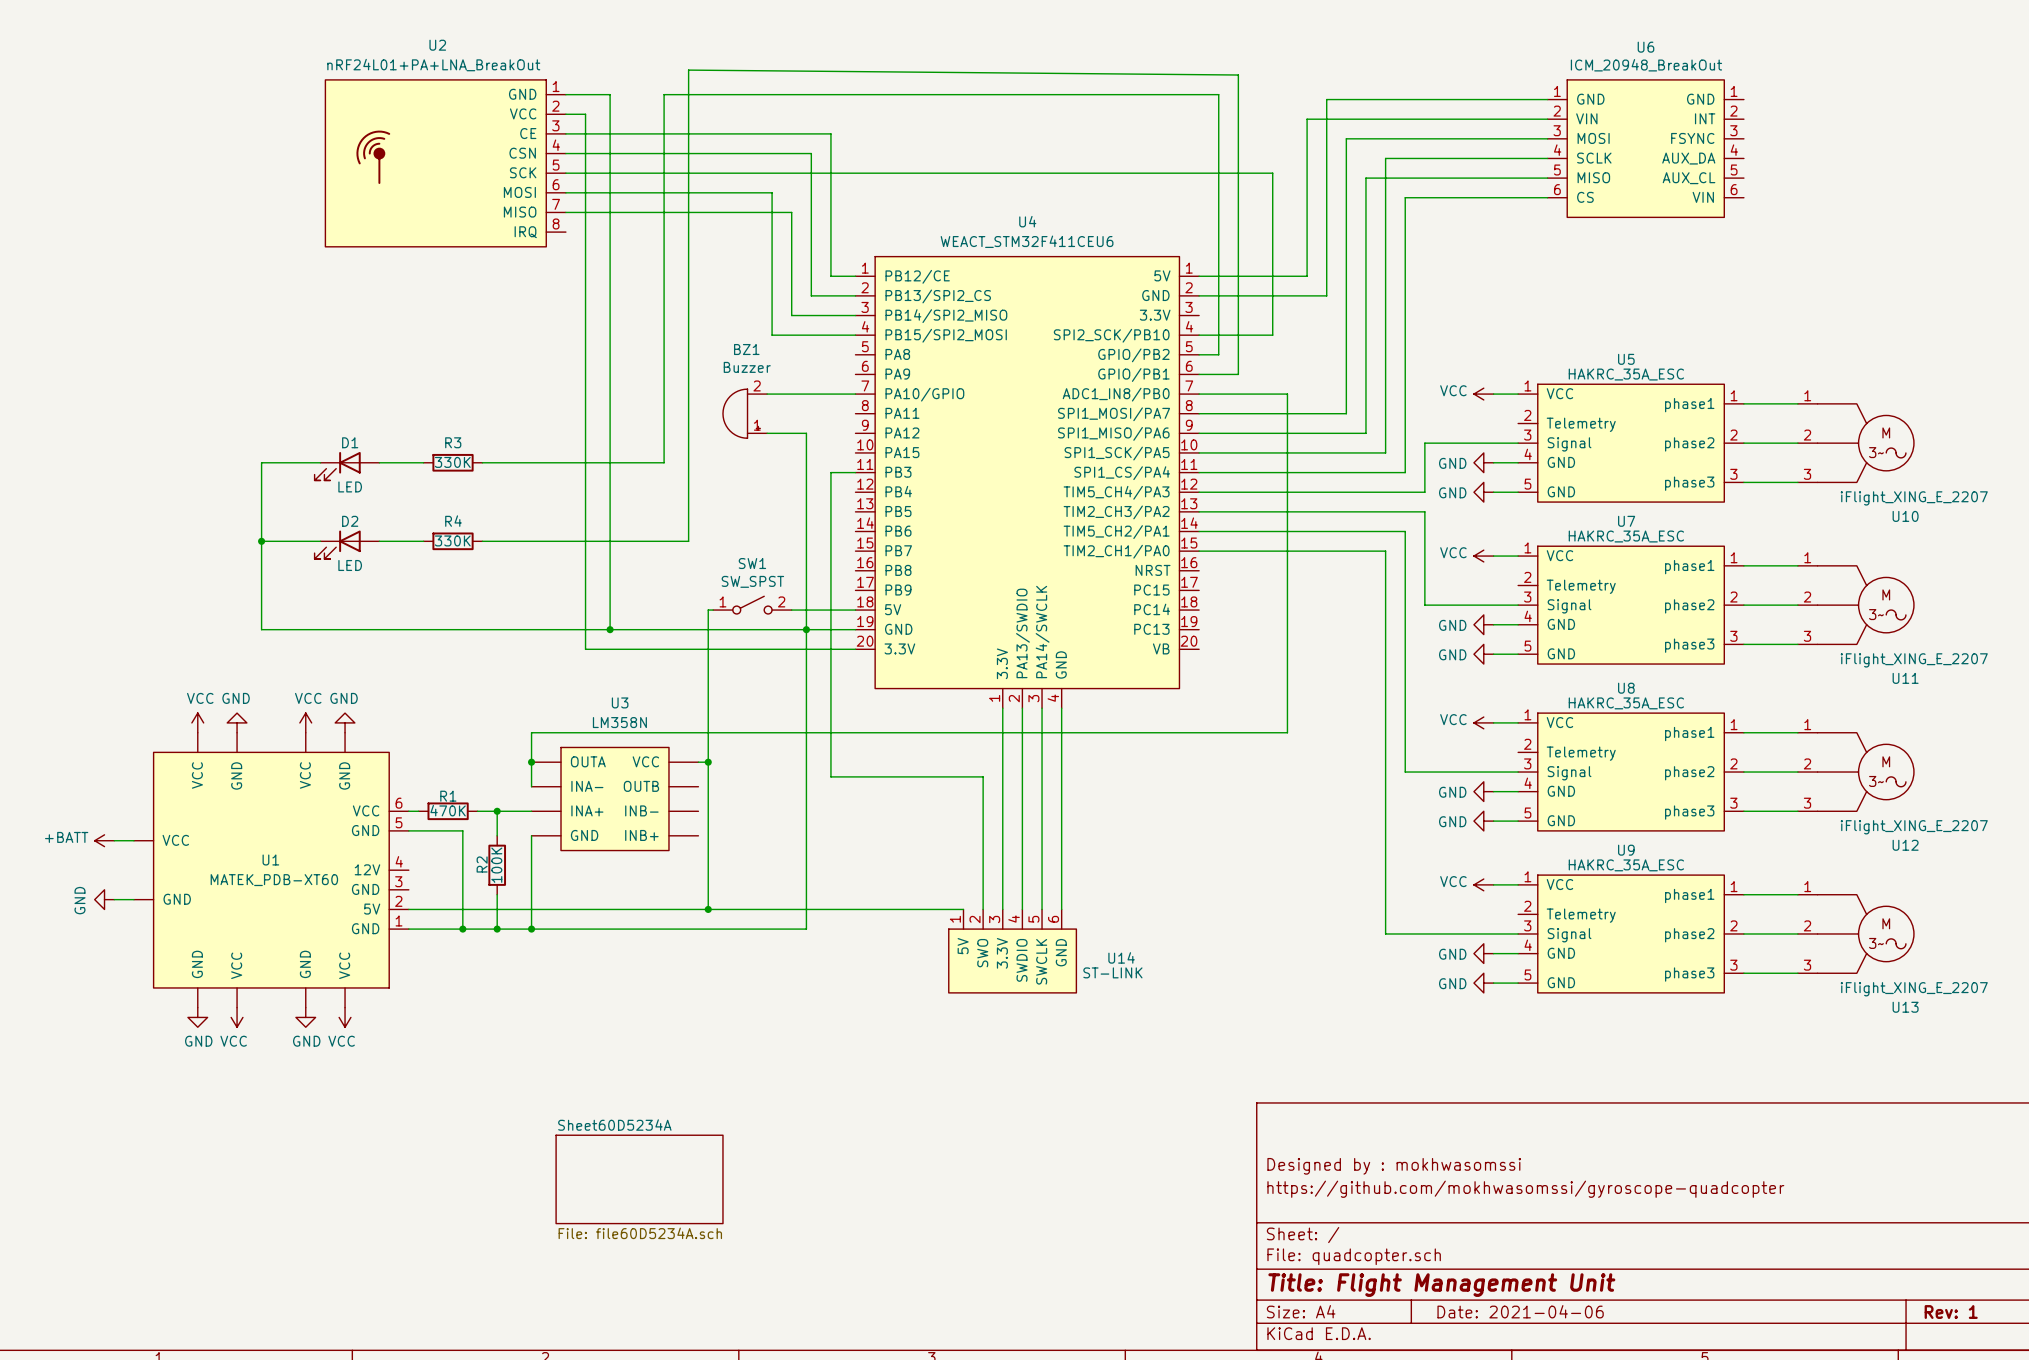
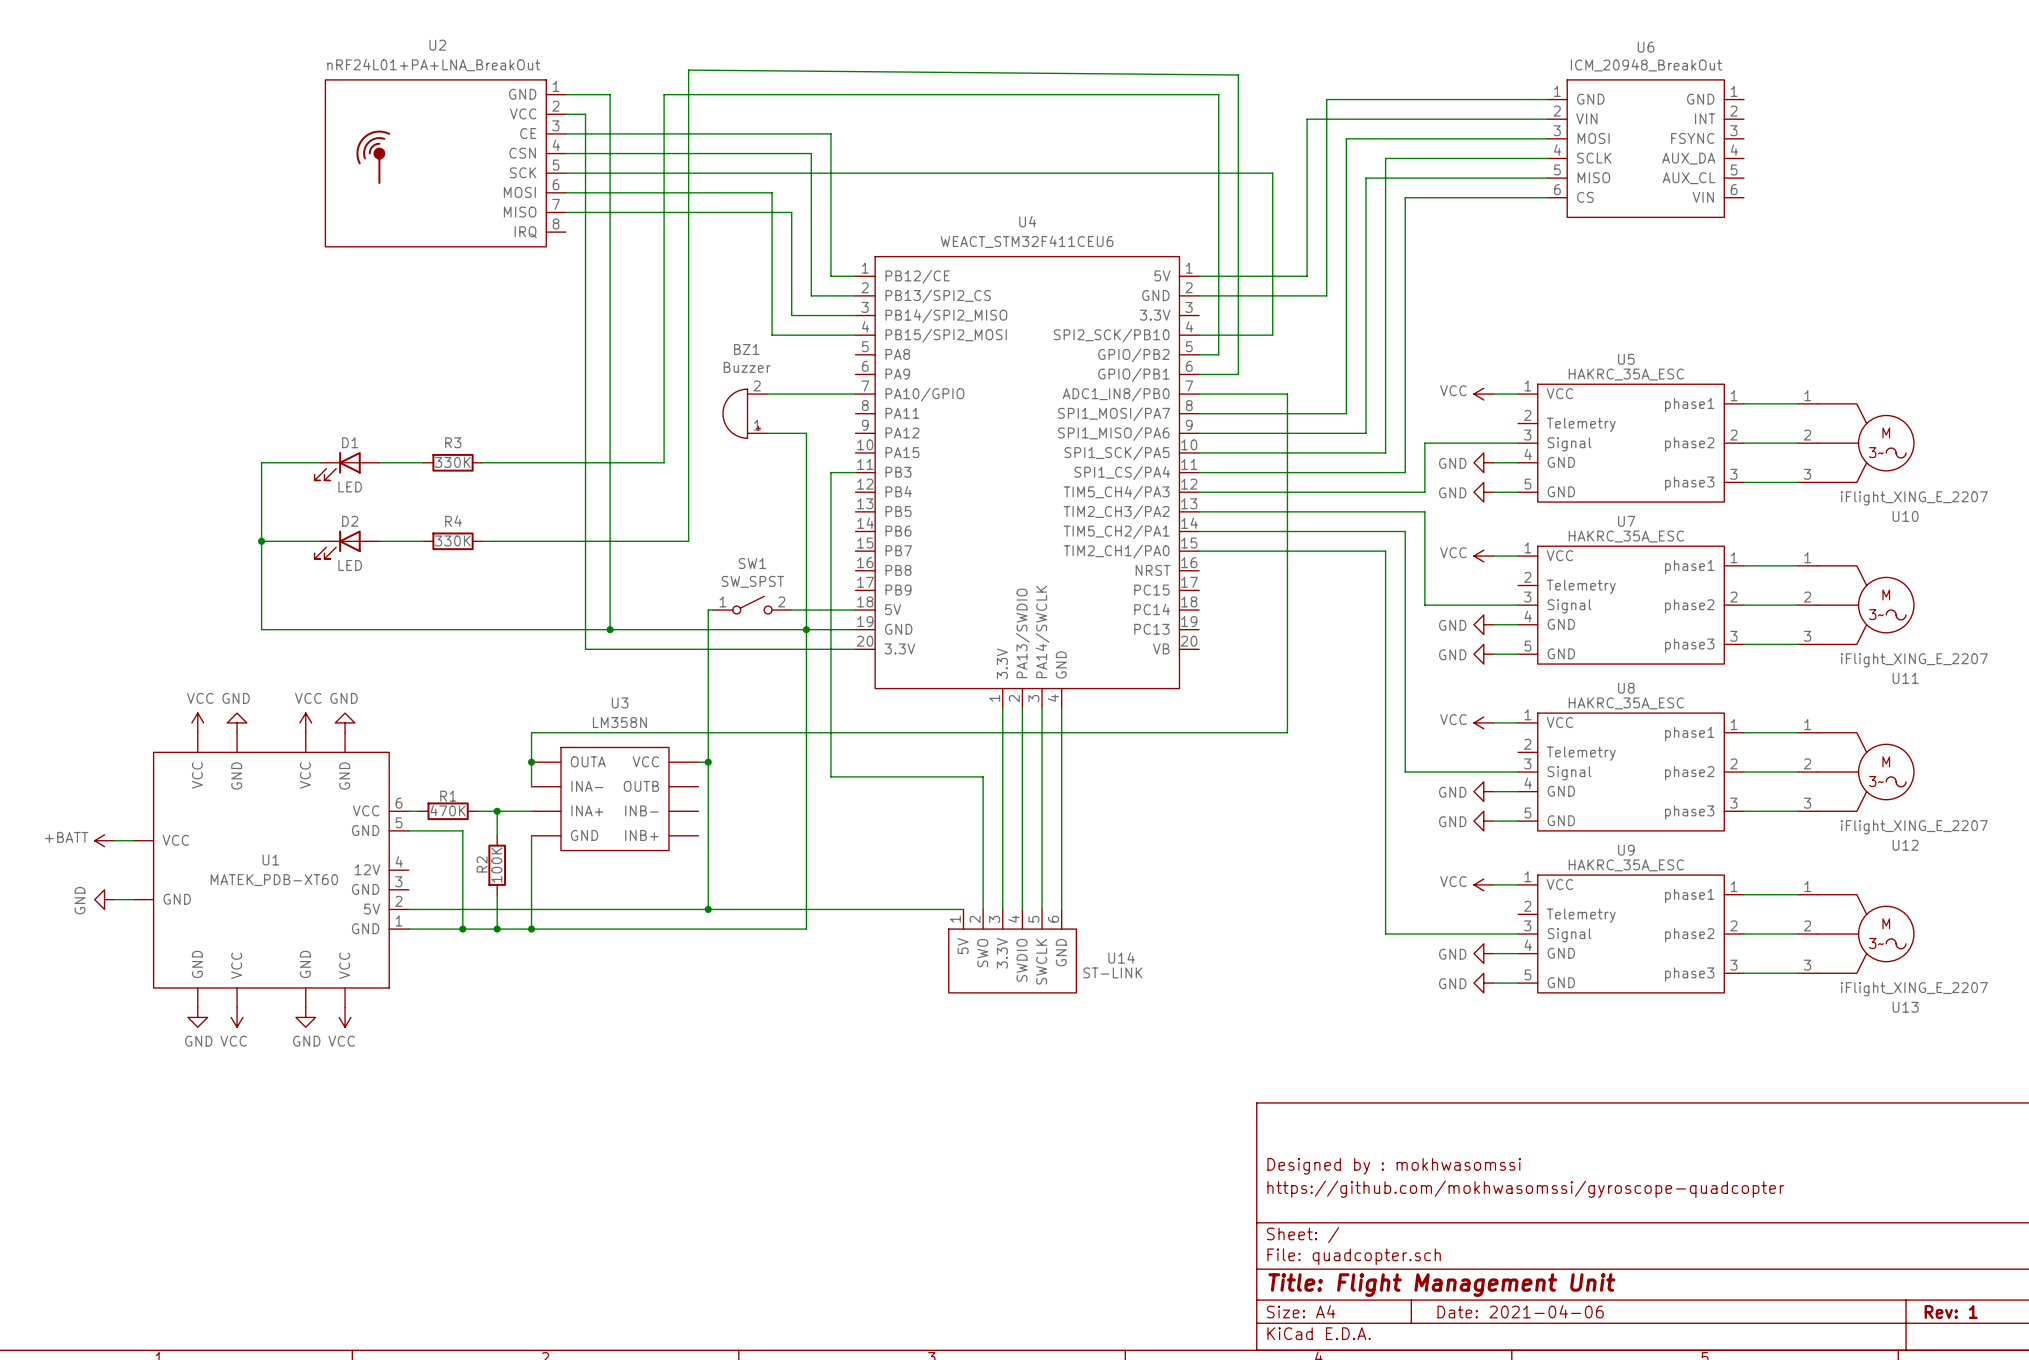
sheet Sheet60D5234A: File: file60D5234A.sch (639, 1179) -> none

